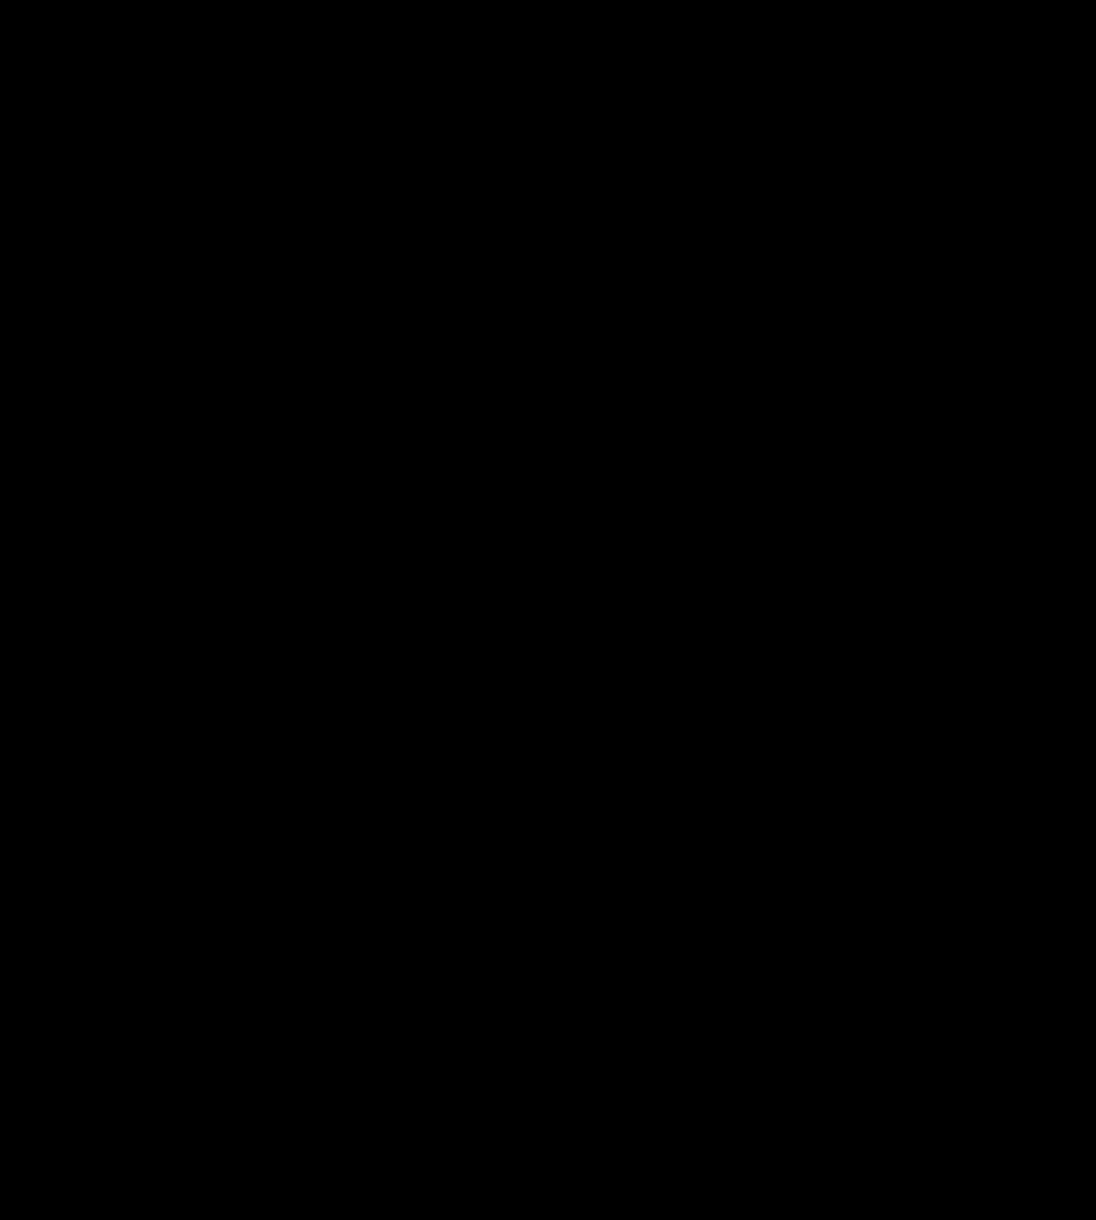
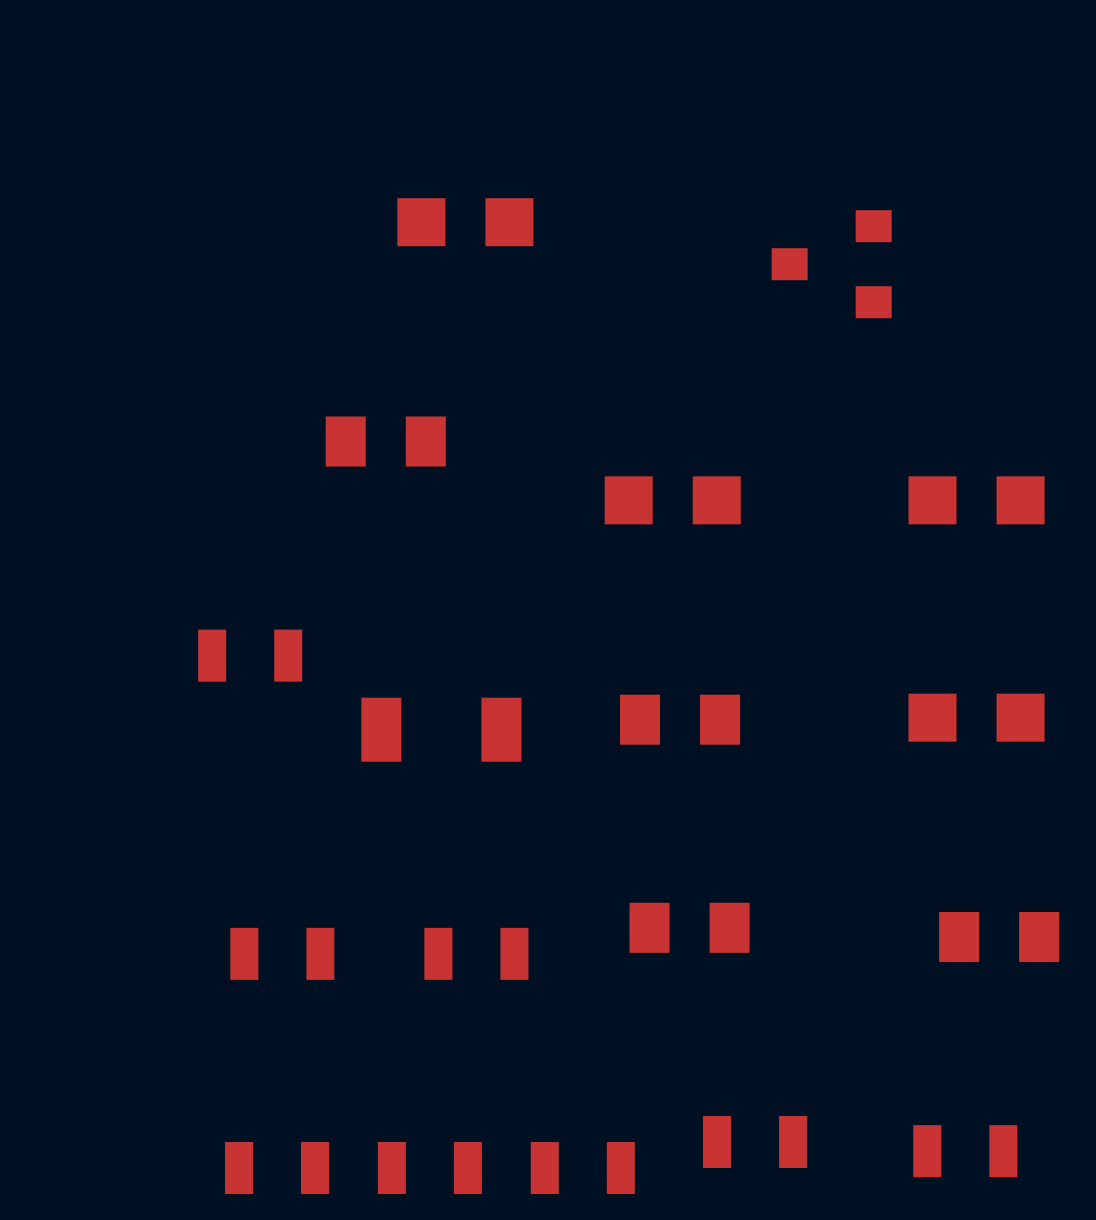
part: none -> (465, 222)
part: none -> (831, 264)
part: none -> (385, 441)
part: none -> (672, 500)
part: none -> (976, 500)
part: none -> (250, 655)
part: none -> (976, 717)
part: none -> (680, 719)
part: none -> (441, 729)
part: none -> (689, 927)
part: none -> (999, 937)
part: none -> (282, 953)
part: none -> (476, 953)
part: none -> (755, 1141)
part: none -> (965, 1151)
part: none -> (277, 1167)
part: none -> (429, 1167)
part: none -> (582, 1167)

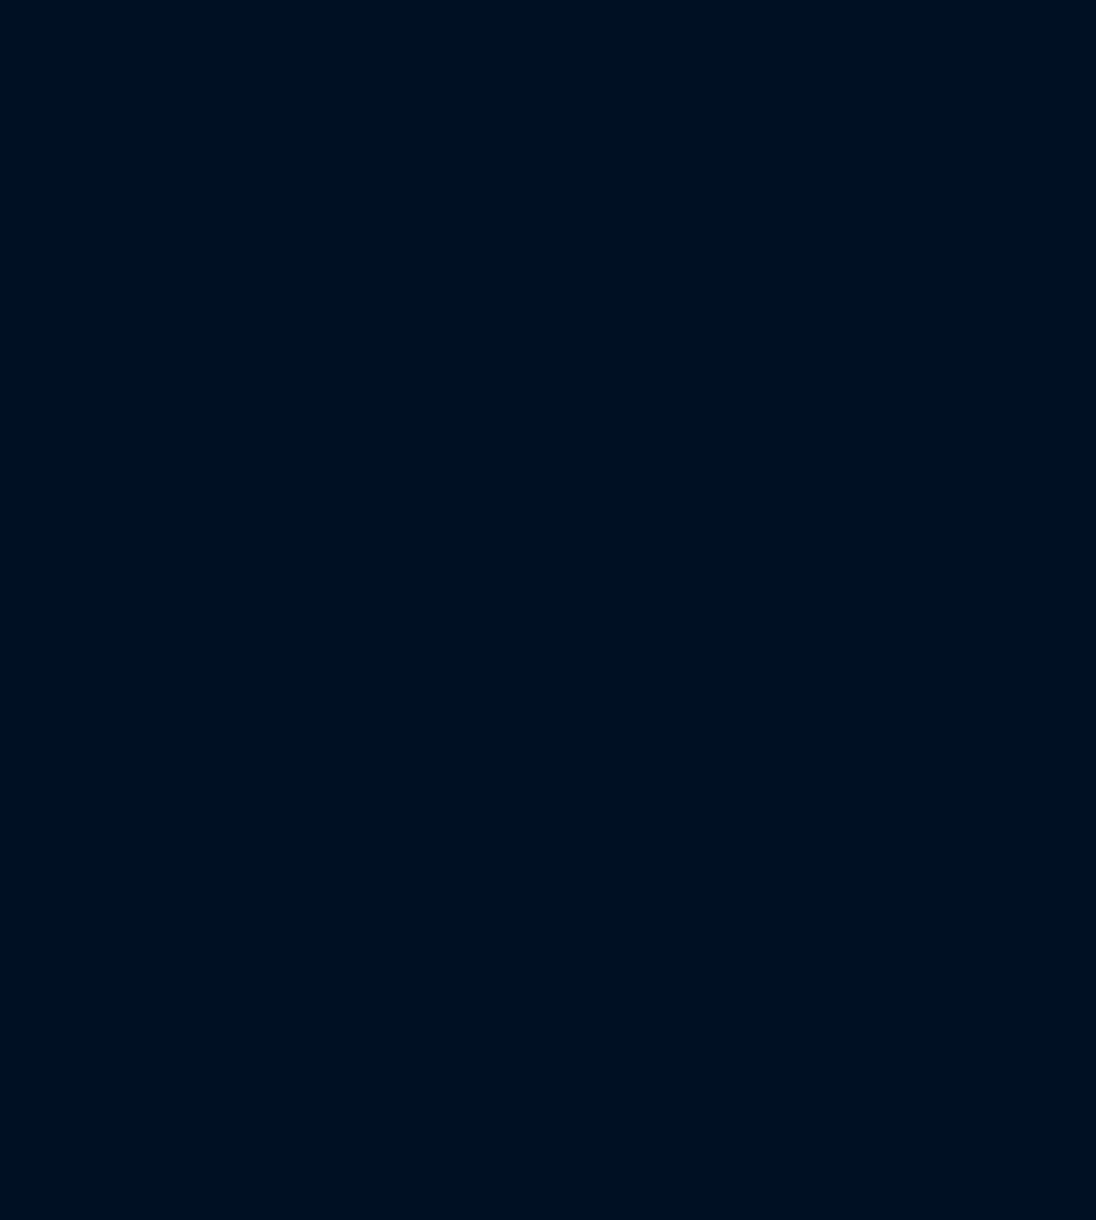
part: (465, 222) -> none
part: (831, 264) -> none
part: (385, 441) -> none
part: (672, 500) -> none
part: (976, 500) -> none
part: (250, 655) -> none
part: (976, 717) -> none
part: (680, 719) -> none
part: (441, 729) -> none
part: (689, 927) -> none
part: (999, 937) -> none
part: (282, 953) -> none
part: (476, 953) -> none
part: (755, 1141) -> none
part: (965, 1151) -> none
part: (277, 1167) -> none
part: (429, 1167) -> none
part: (582, 1167) -> none

